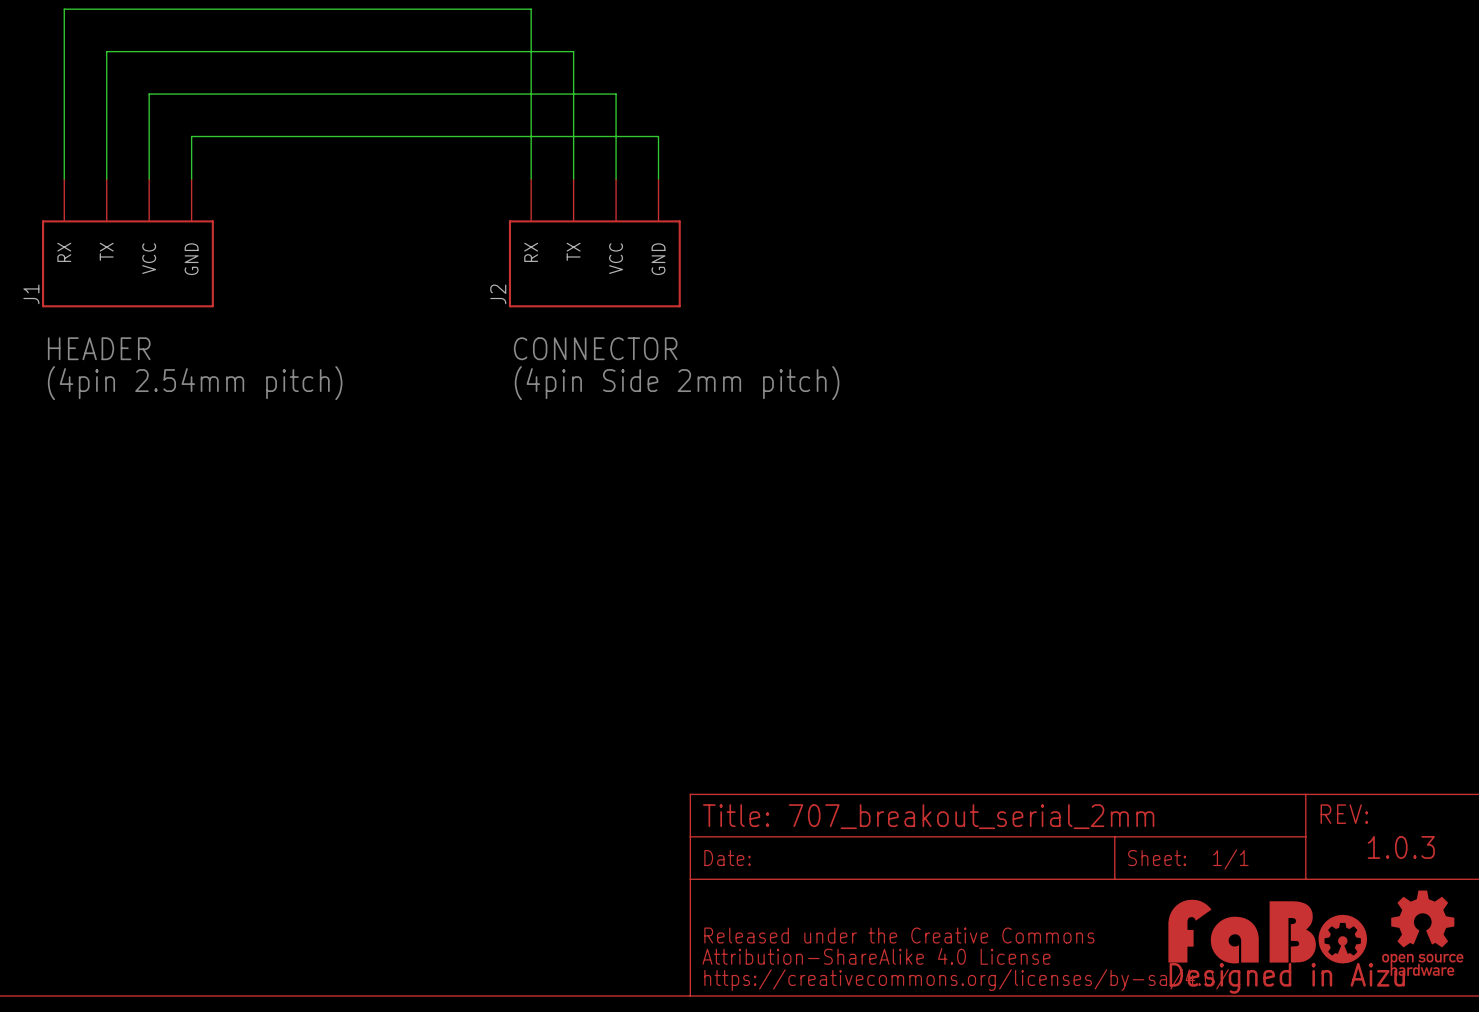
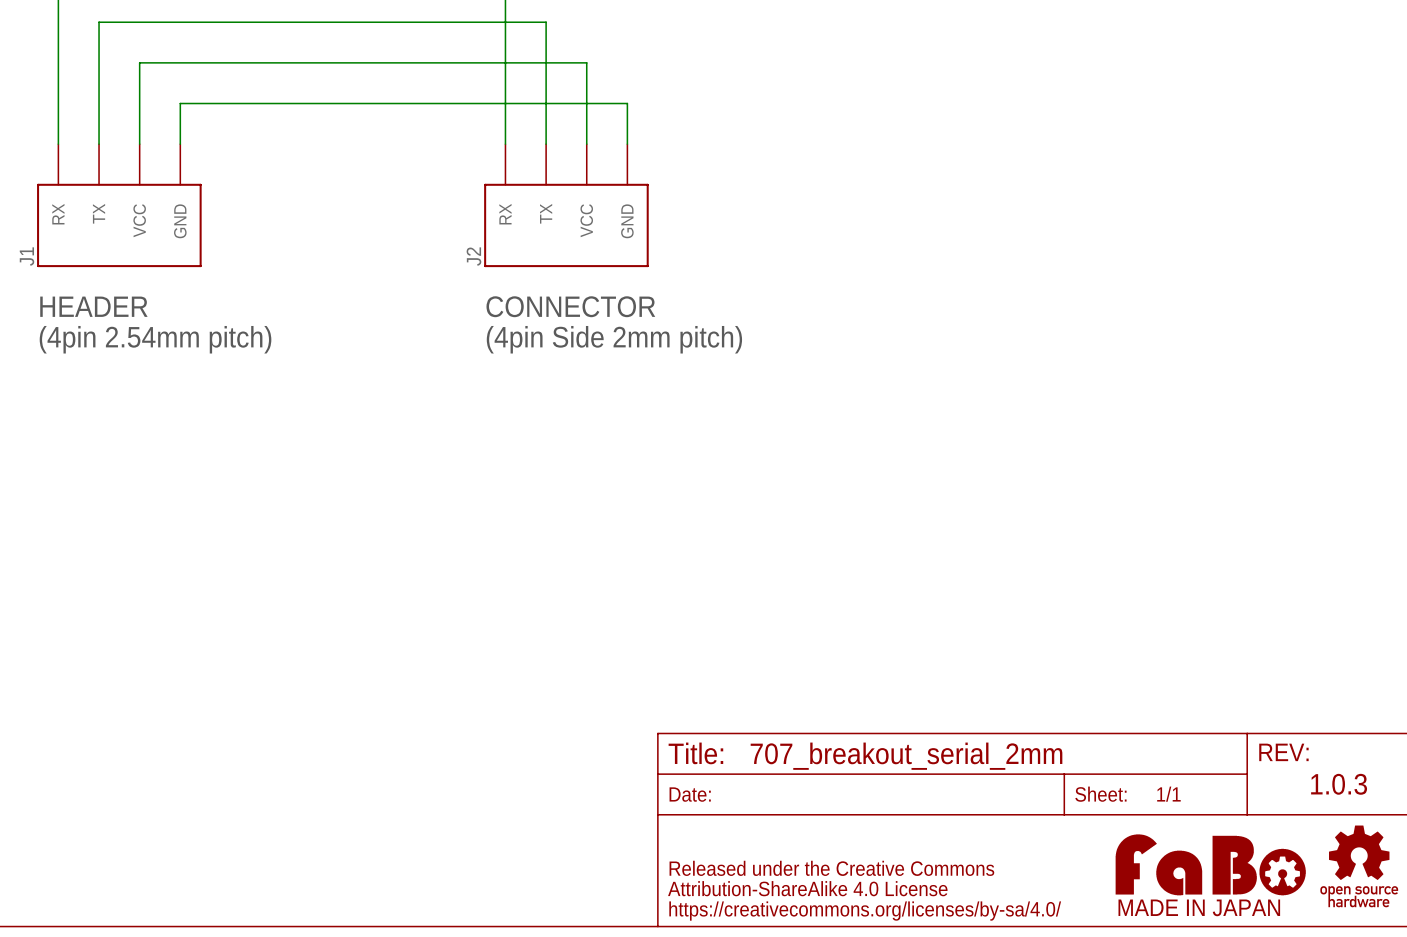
part text: none -> MADE IN JAPAN (1199, 907)
part text: Designed in Aizu (1287, 978) -> none

